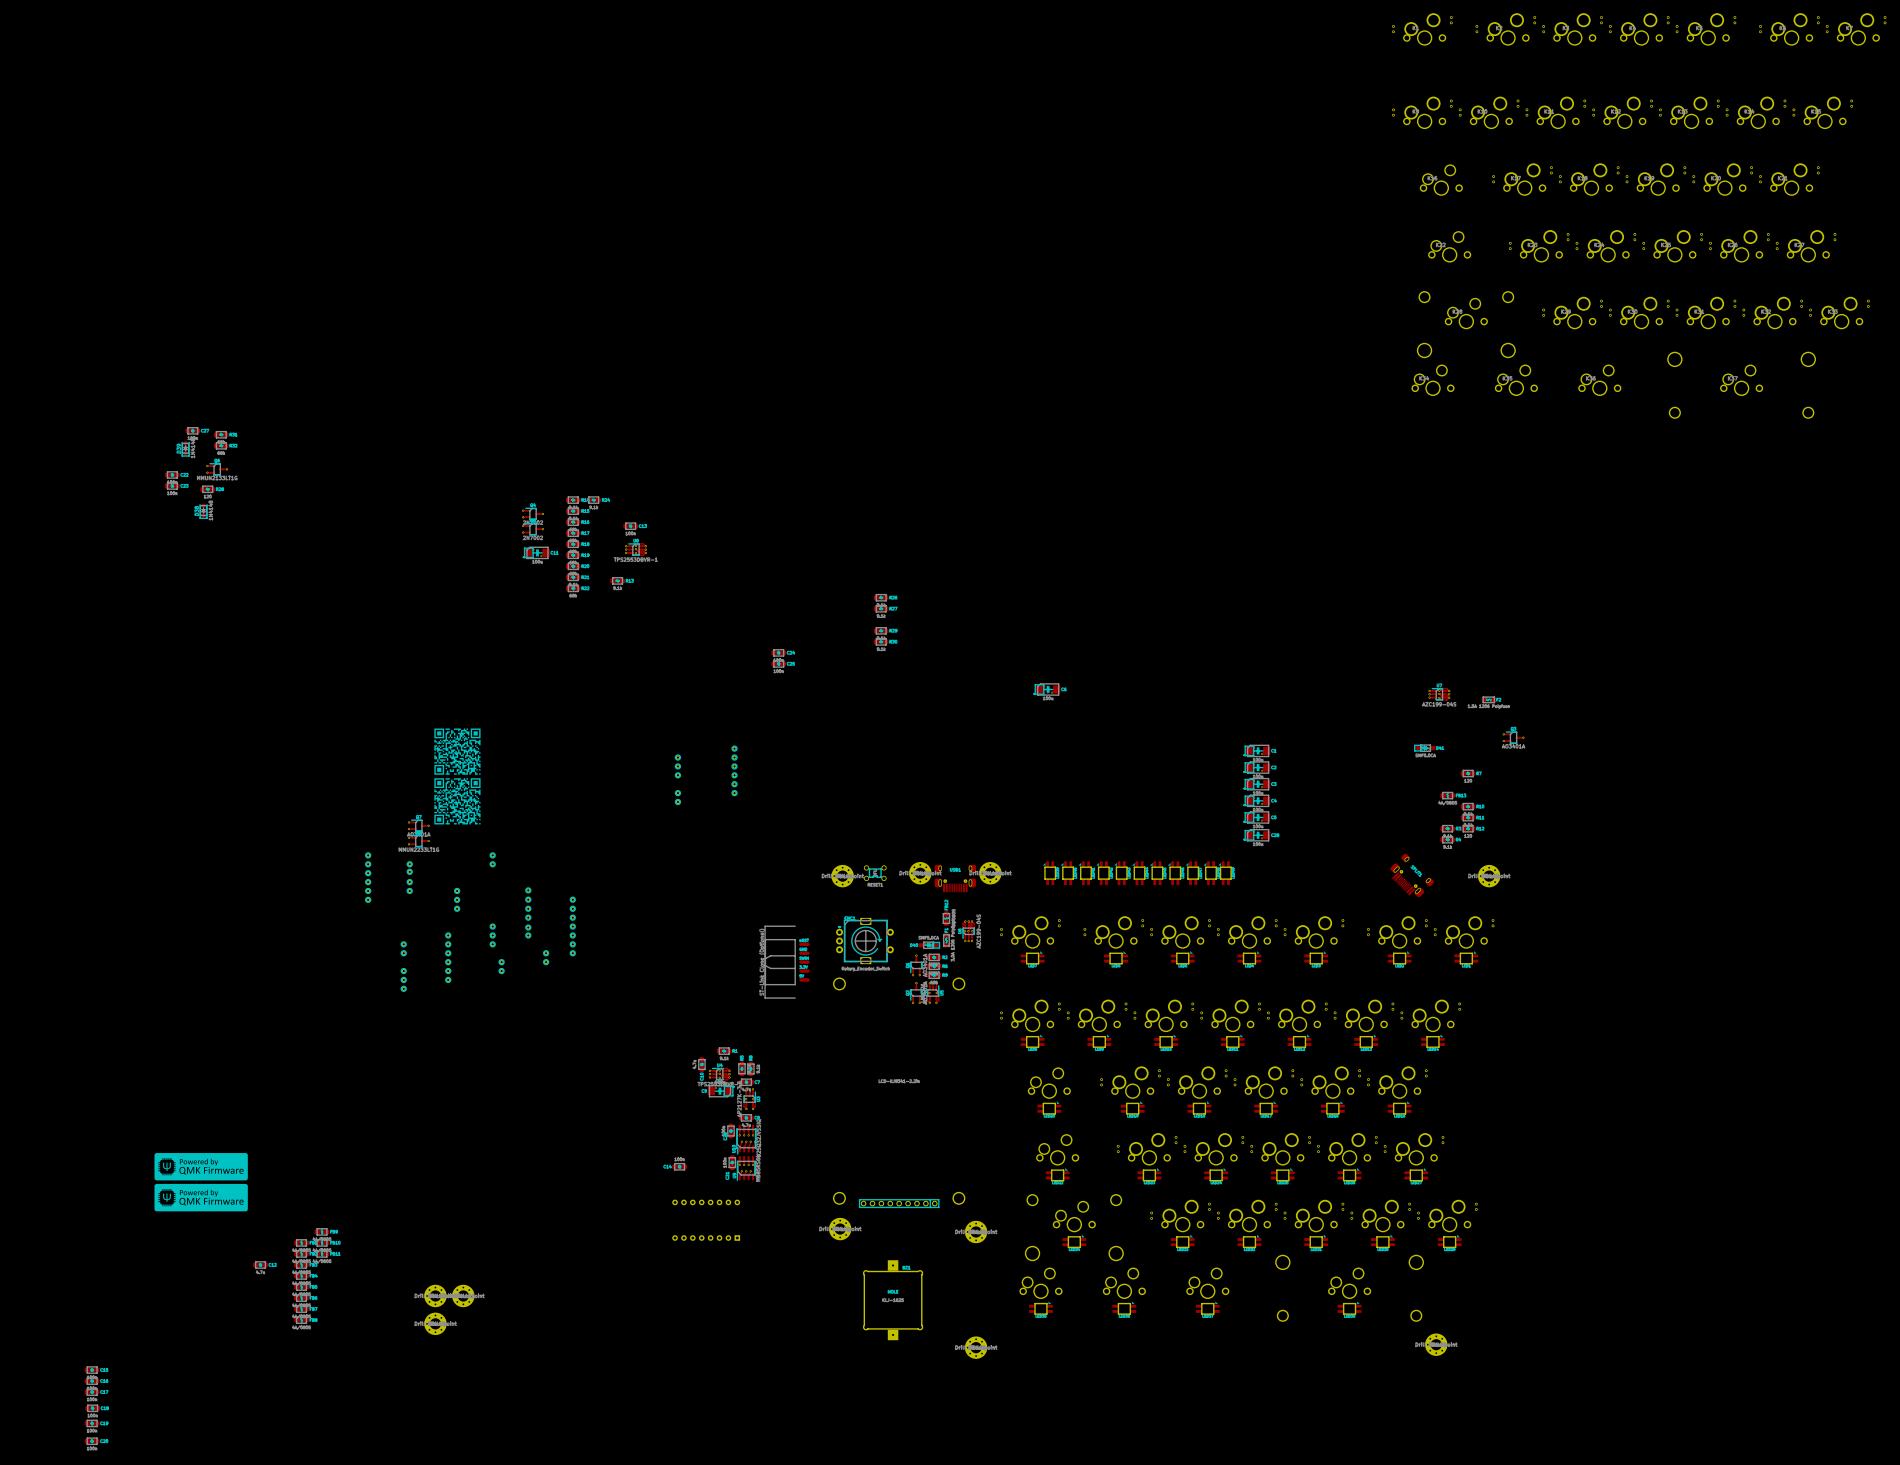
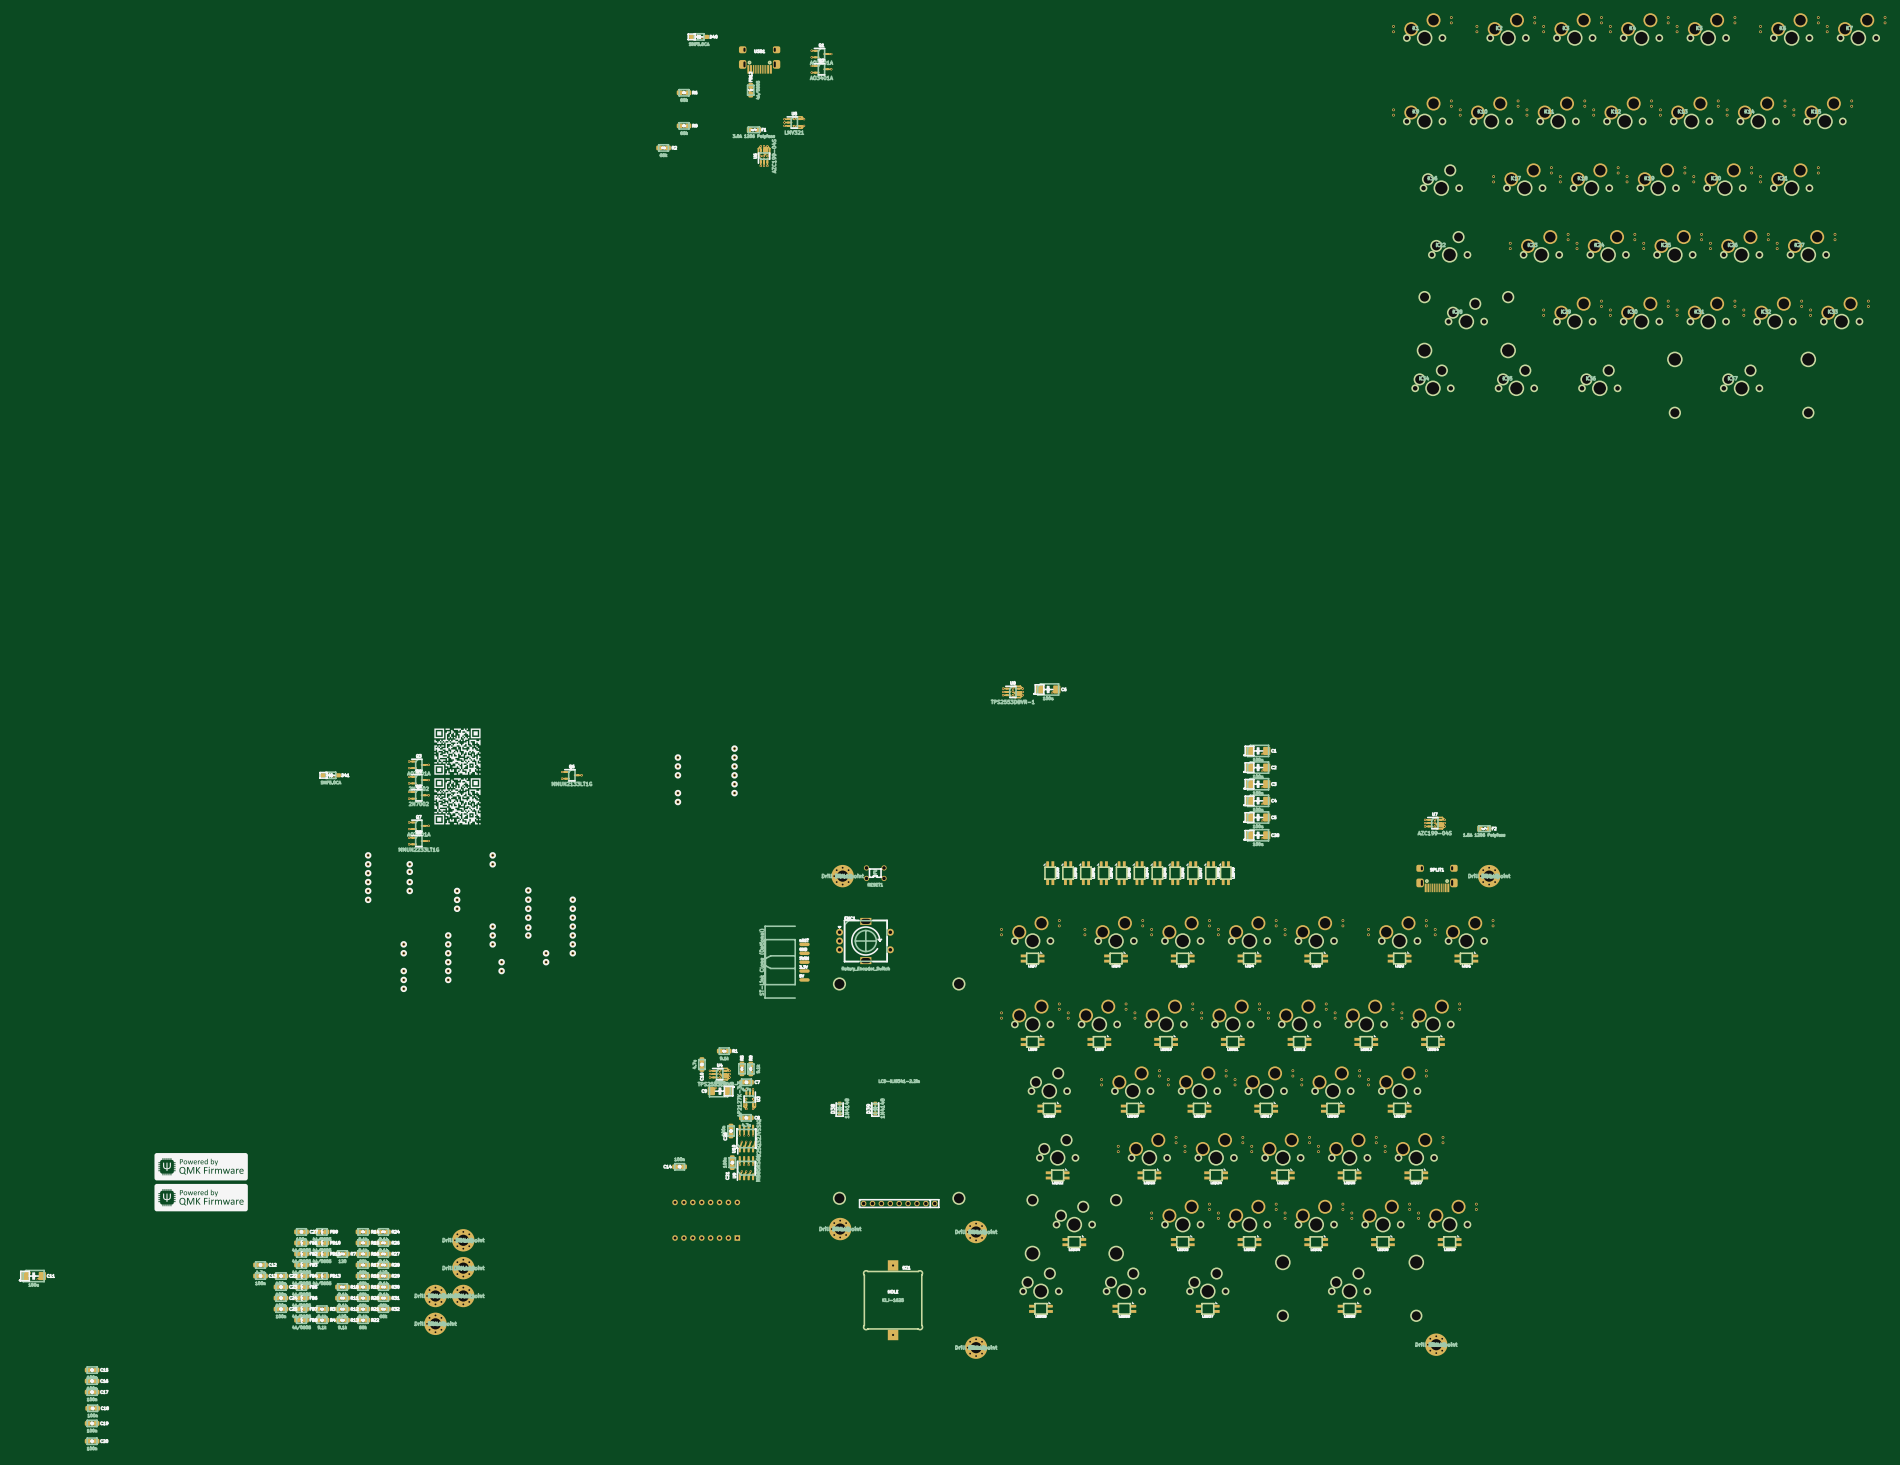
part position: (192, 430) -> (301, 1231)
part position: (221, 434) -> (383, 1298)
part position: (221, 445) -> (383, 1309)
part position: (185, 448) -> (875, 1109)
part position: (217, 469) -> (571, 775)
part position: (172, 474) -> (281, 1276)
part position: (172, 485) -> (281, 1287)
part position: (207, 489) -> (383, 1264)
part position: (573, 500) -> (362, 1231)
part position: (593, 500) -> (383, 1231)
part position: (203, 511) -> (839, 1109)
part position: (573, 511) -> (362, 1242)
part position: (533, 513) -> (418, 780)
part position: (573, 522) -> (362, 1253)
part position: (630, 526) -> (260, 1276)
part position: (533, 529) -> (418, 795)
part position: (573, 533) -> (362, 1264)
part position: (573, 544) -> (362, 1276)
part position: (635, 549) -> (1012, 691)
part position: (536, 552) -> (32, 1276)
part position: (573, 555) -> (362, 1287)
part position: (573, 566) -> (362, 1298)
part position: (573, 577) -> (362, 1309)
part position: (617, 580) -> (342, 1320)
part position: (573, 588) -> (362, 1320)
part position: (881, 597) -> (383, 1242)
part position: (881, 608) -> (383, 1253)
part position: (881, 630) -> (383, 1276)
part position: (881, 641) -> (383, 1287)
part position: (778, 652) -> (281, 1298)
part position: (778, 663) -> (281, 1309)
part position: (1439, 694) -> (1434, 823)
part position: (1488, 699) -> (1484, 828)
part position: (1513, 737) -> (418, 764)
part position: (1425, 748) -> (330, 775)
part position: (1468, 773) -> (342, 1253)
part position: (1447, 795) -> (321, 1276)
part position: (1468, 806) -> (342, 1287)
part position: (1468, 817) -> (342, 1298)
part position: (1447, 828) -> (321, 1309)
part position: (1468, 828) -> (342, 1309)
part position: (1447, 839) -> (321, 1320)
part position: (920, 873) -> (463, 1240)
part position: (990, 873) -> (463, 1268)
part rotation: 0° (1412, 875) -> 45° counterclockwise (1436, 878)
part position: (955, 878) -> (759, 59)
part position: (946, 918) -> (750, 90)
part position: (968, 931) -> (764, 156)
part rotation: 0° (946, 940) -> 90° clockwise (753, 129)
part position: (946, 940) -> (753, 129)
part rotation: 0° (929, 945) -> 180° (698, 36)
part position: (929, 945) -> (698, 36)
part position: (934, 957) -> (663, 147)
part rotation: 0° (916, 965) -> 90° clockwise (821, 54)
part position: (916, 965) -> (821, 54)
part position: (934, 966) -> (684, 92)
part position: (934, 975) -> (684, 125)
part rotation: 0° (916, 993) -> 90° clockwise (821, 69)
part position: (916, 993) -> (821, 69)
part rotation: 0° (933, 993) -> 90° counterclockwise (794, 122)
part position: (933, 993) -> (794, 122)

